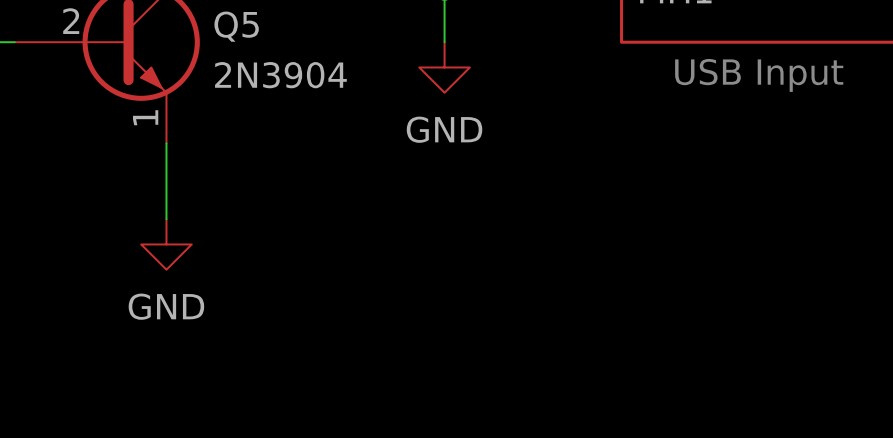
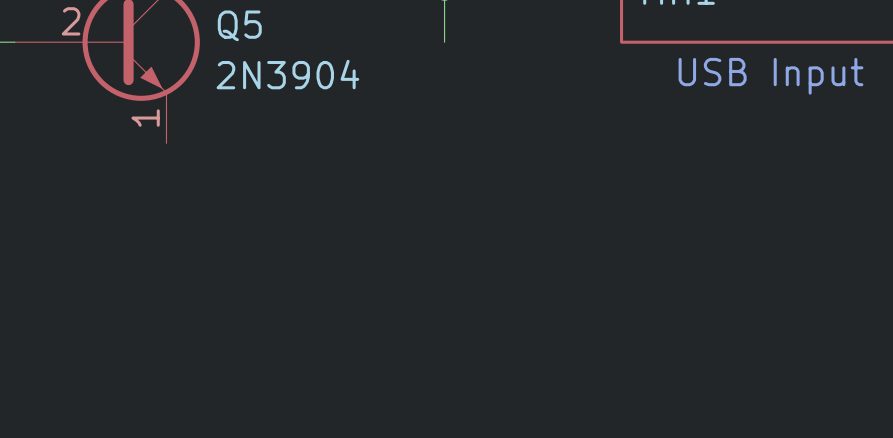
power symbol: GND (444, 67) -> none
wire: (166, 143) (166, 219) -> none
power symbol: GND (166, 244) -> none

